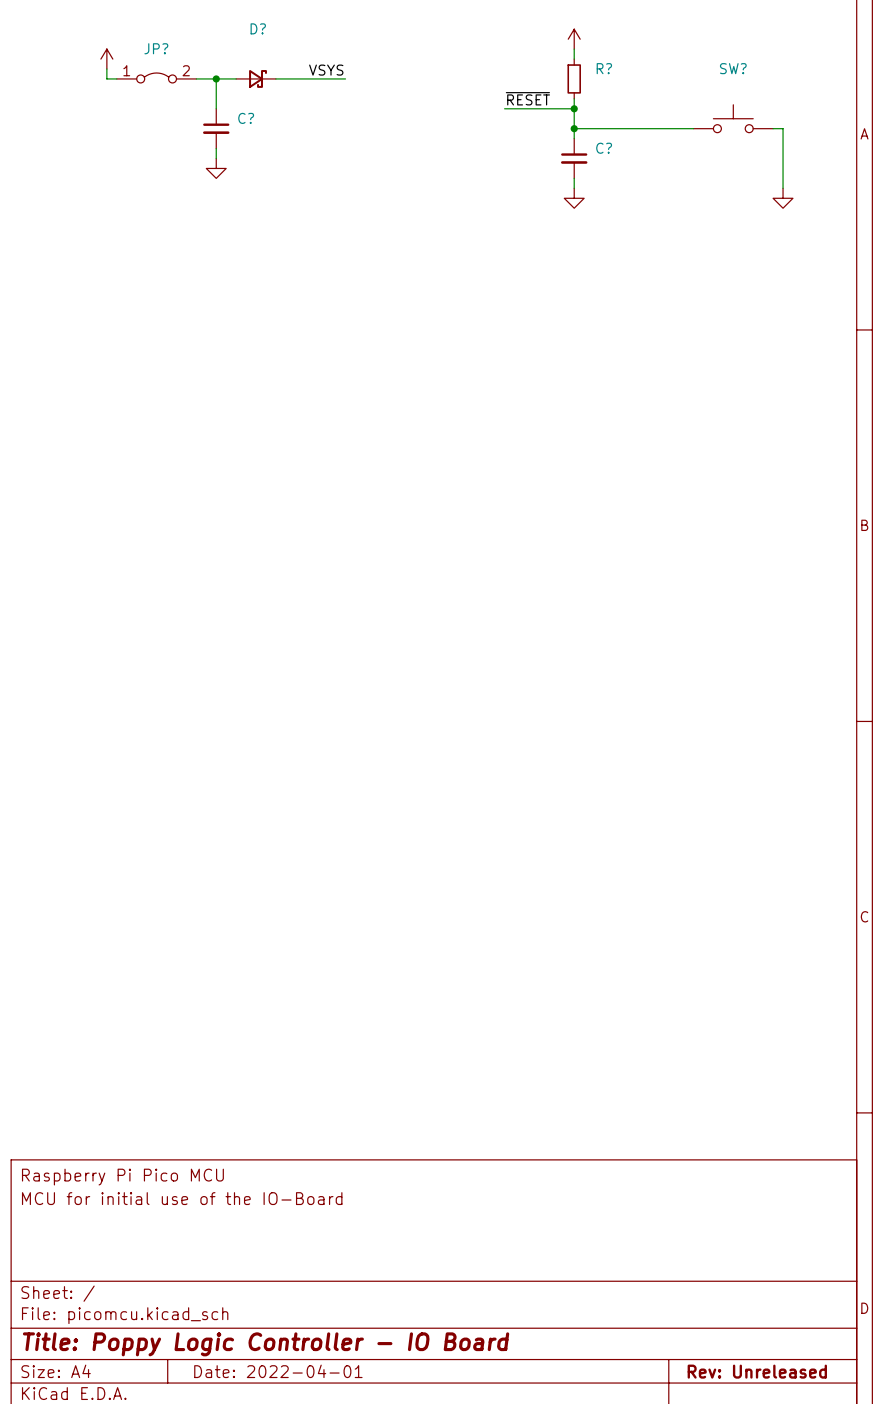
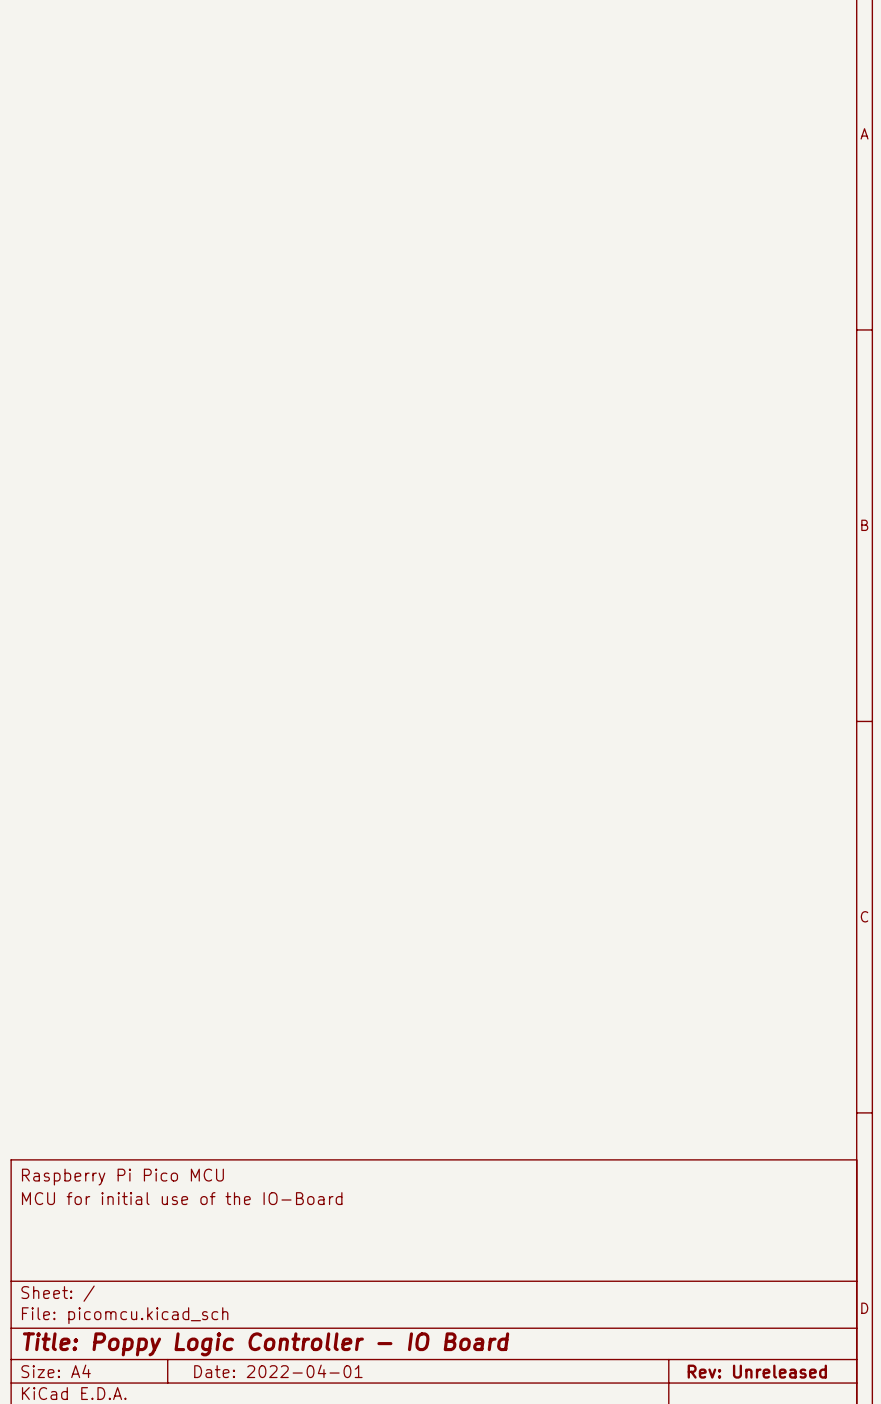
power symbol: (574, 39) -> none
wire: (574, 49) (574, 59) -> none
power symbol: (106, 59) -> none
wire: (106, 69) (106, 78) (116, 78) -> none
label: VSYS (326, 70) -> none
JP?: (156, 77) -> none
wire: (196, 78) (236, 78) -> none
wire: (216, 78) (216, 108) -> none
junction: (216, 78) -> none
D?: (256, 78) -> none
wire: (275, 78) (345, 78) -> none
R?: (574, 78) -> none
label: ~{RESET} (527, 98) -> none
wire: (574, 98) (574, 138) -> none
wire: (504, 108) (574, 108) -> none
junction: (574, 108) -> none
SW?: (733, 118) -> none
C?: (216, 128) -> none
wire: (574, 128) (693, 128) -> none
junction: (574, 128) -> none
wire: (773, 128) (783, 128) (783, 188) -> none
wire: (216, 148) (216, 158) -> none
C?: (574, 158) -> none
power symbol: (216, 168) -> none
wire: (574, 178) (574, 188) -> none
power symbol: (574, 198) -> none
power symbol: (783, 198) -> none

